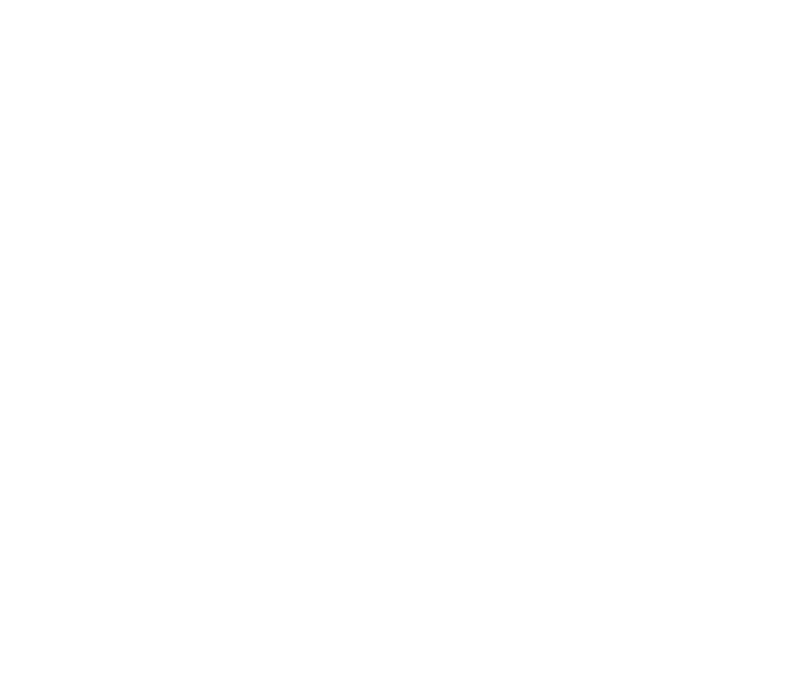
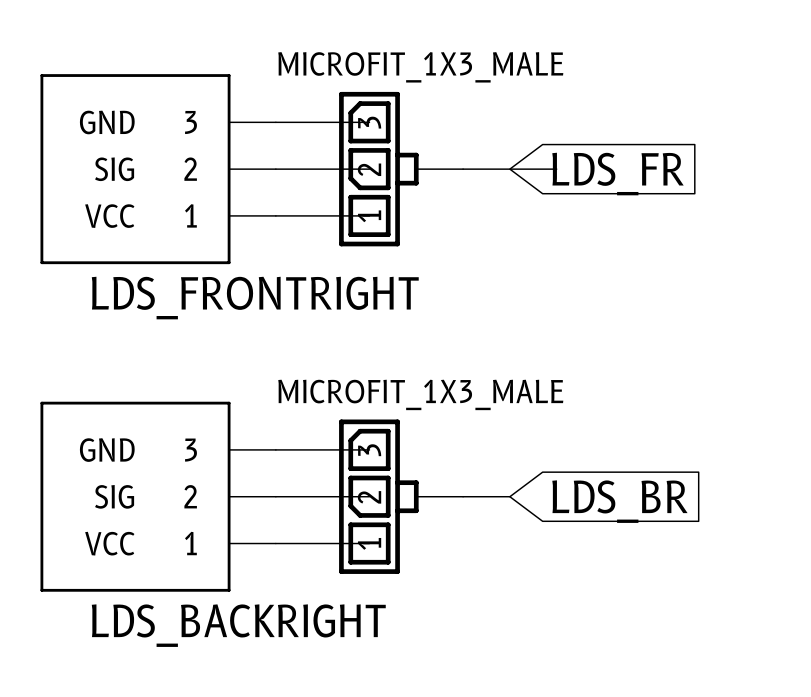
wire: none -> (275, 122) (369, 122)
LDS_FRONTRIGHT: none -> (158, 169)
wire: none -> (275, 169) (369, 169)
part: none -> MICROFIT_1X3_MALE (401, 169)
wire: none -> (463, 169) (556, 169)
global label: none -> LDS_FR (617, 174)
wire: none -> (275, 215) (369, 215)
wire: none -> (275, 449) (369, 449)
LDS_BACKRIGHT: none -> (158, 496)
wire: none -> (275, 496) (369, 496)
part: none -> MICROFIT_1X3_MALE (401, 496)
wire: none -> (463, 496) (509, 496)
global label: none -> LDS_BR (619, 501)
wire: none -> (275, 543) (369, 543)

